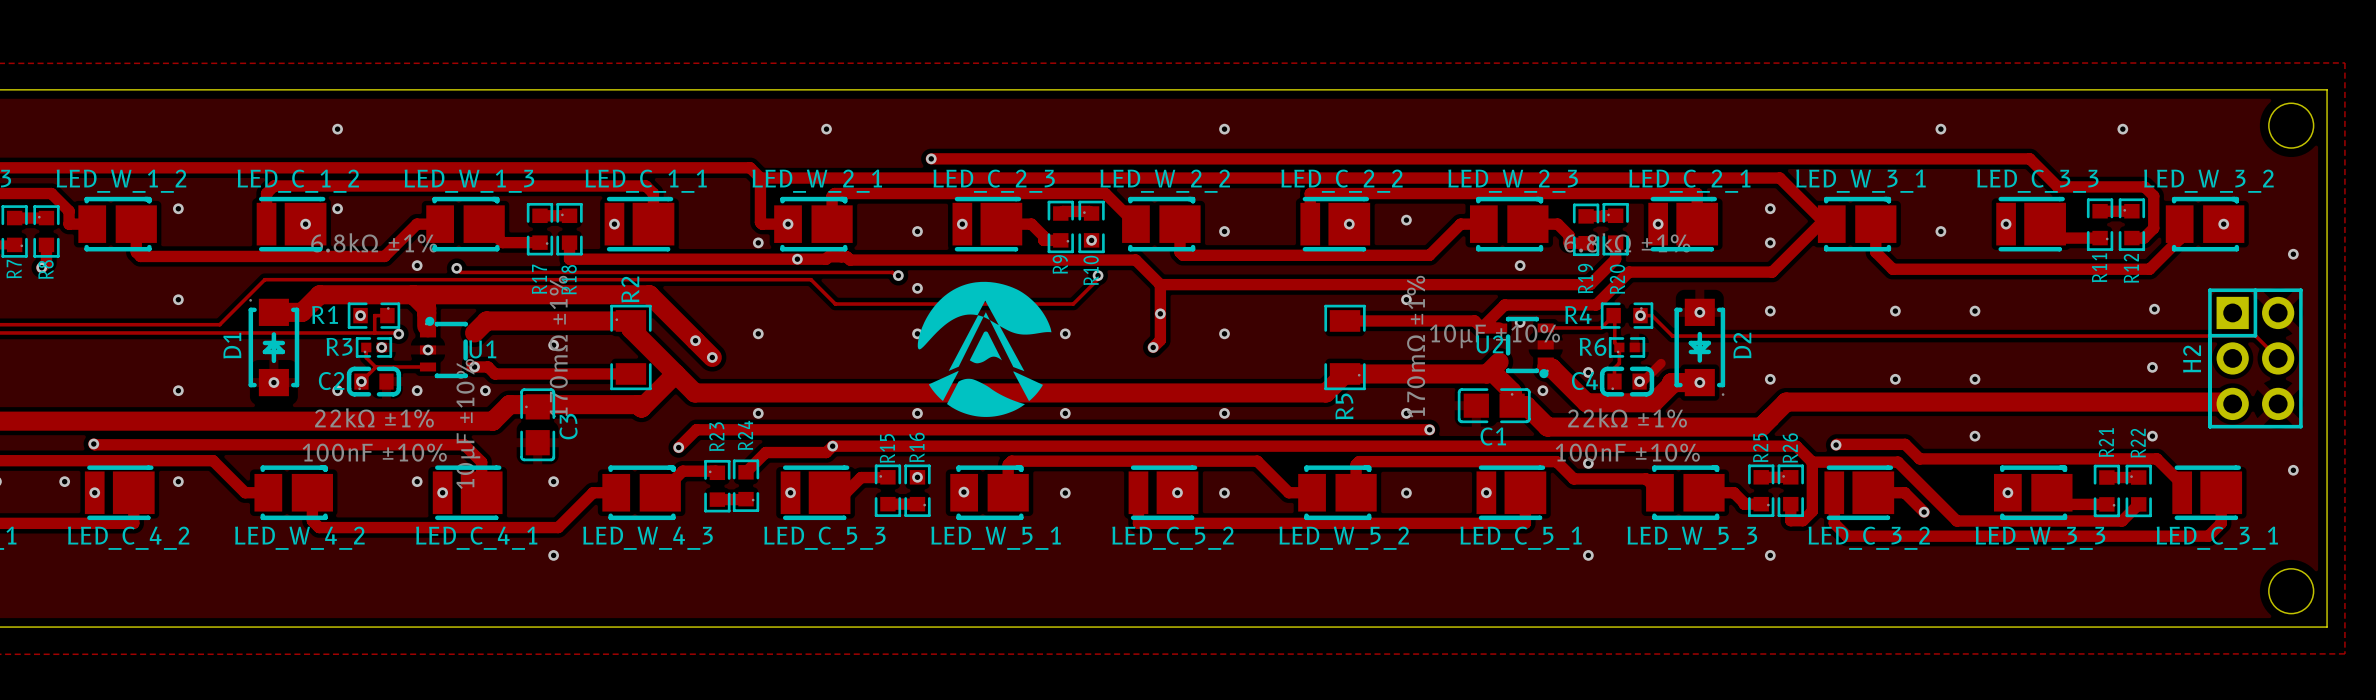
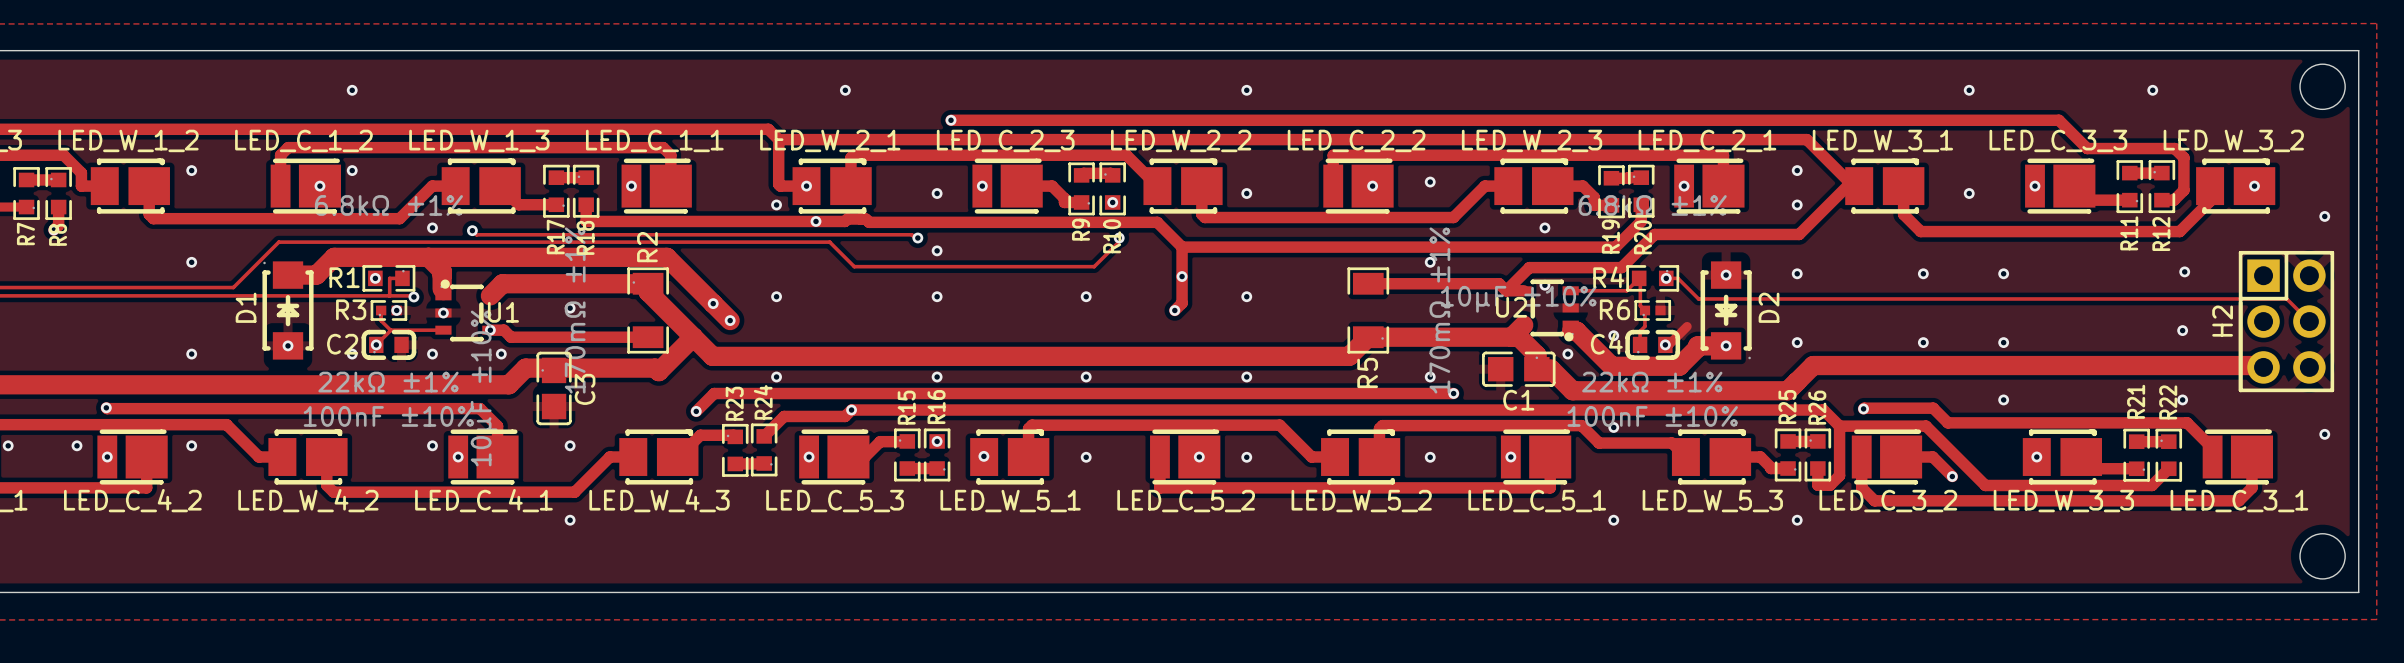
drawing: [917, 281, 1052, 417] -> none

